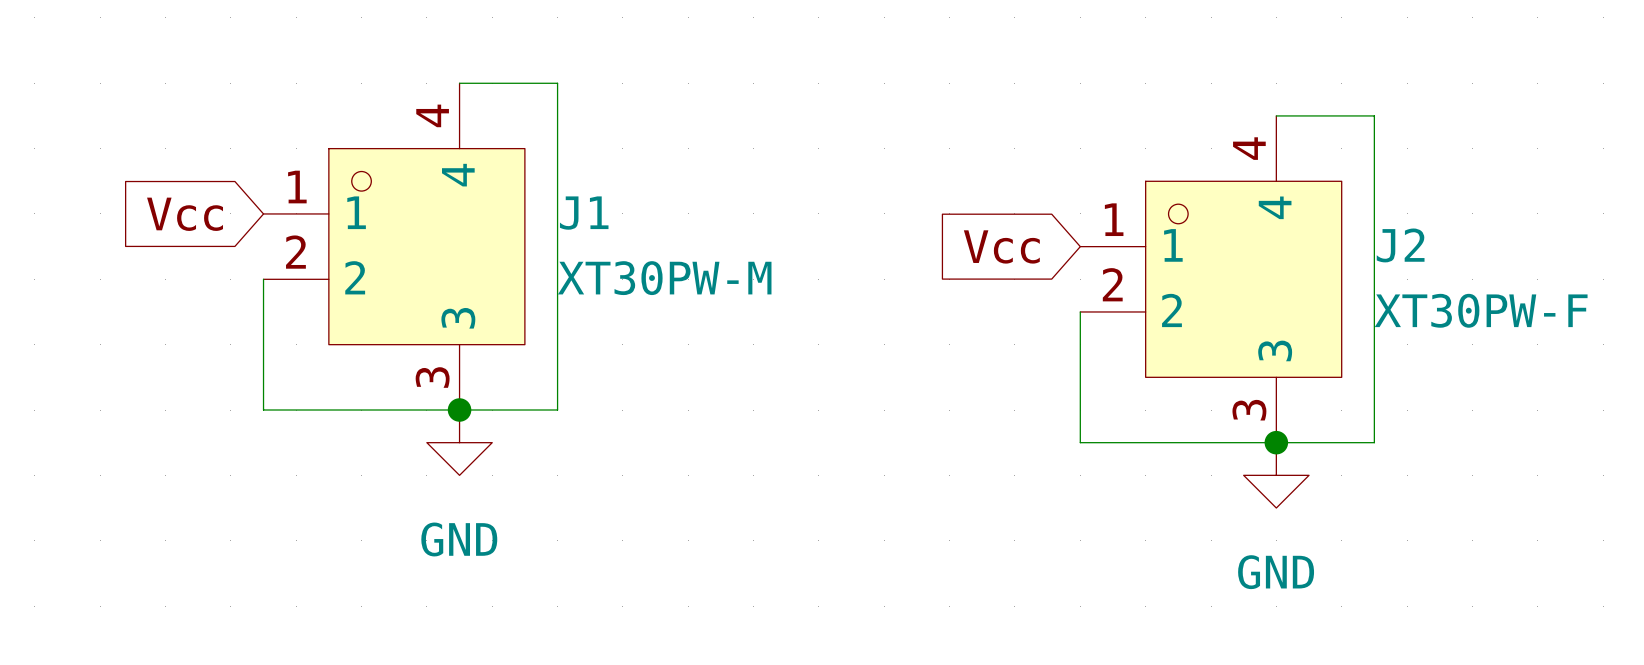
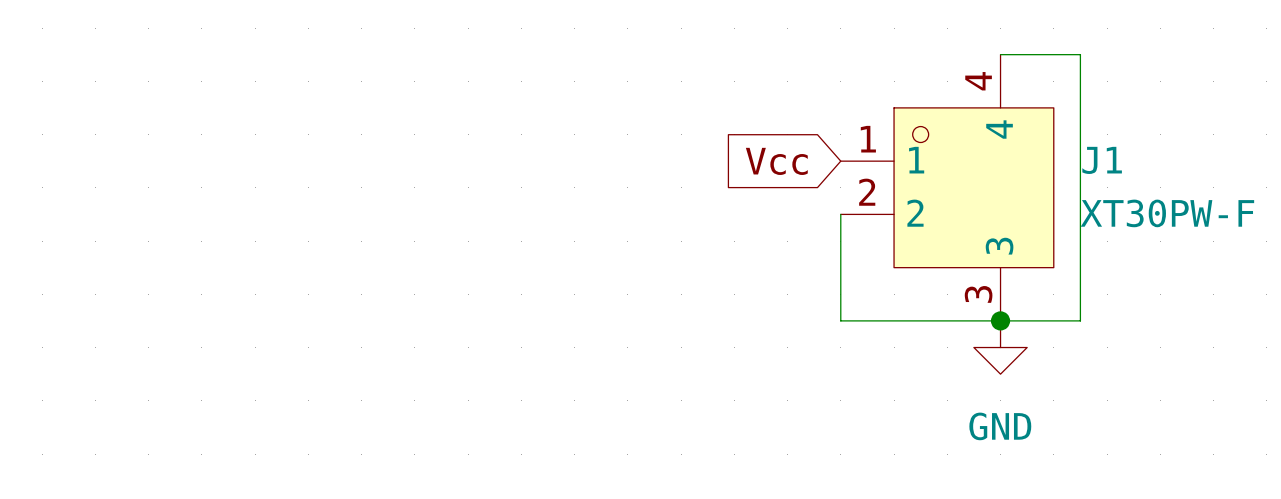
wire: (459, 83) (557, 83) (557, 410) (263, 410) (263, 279) -> none
global label: Vcc (185, 214) -> none
J2 name: J2 (1400, 245) -> J1 (1102, 160)
J1: XT30PW-M (394, 246) -> none
junction: (459, 410) -> none
power symbol: GND (459, 442) -> none

